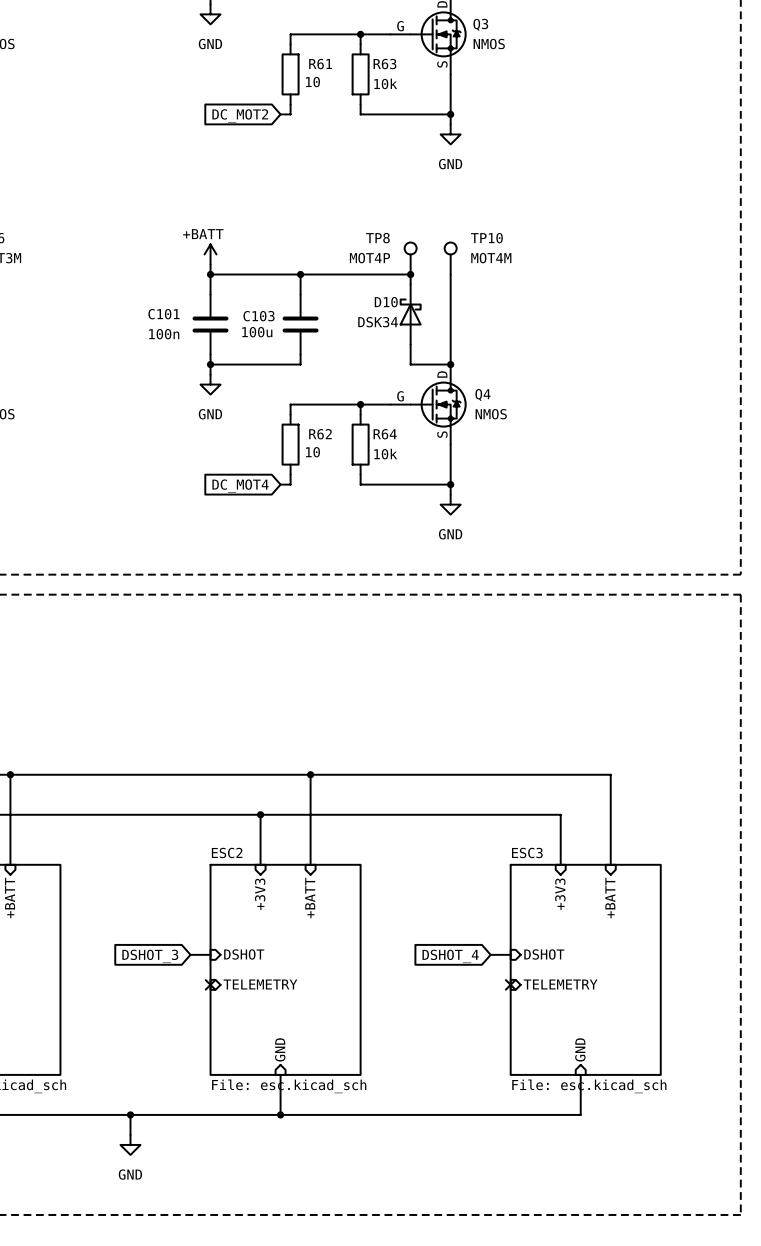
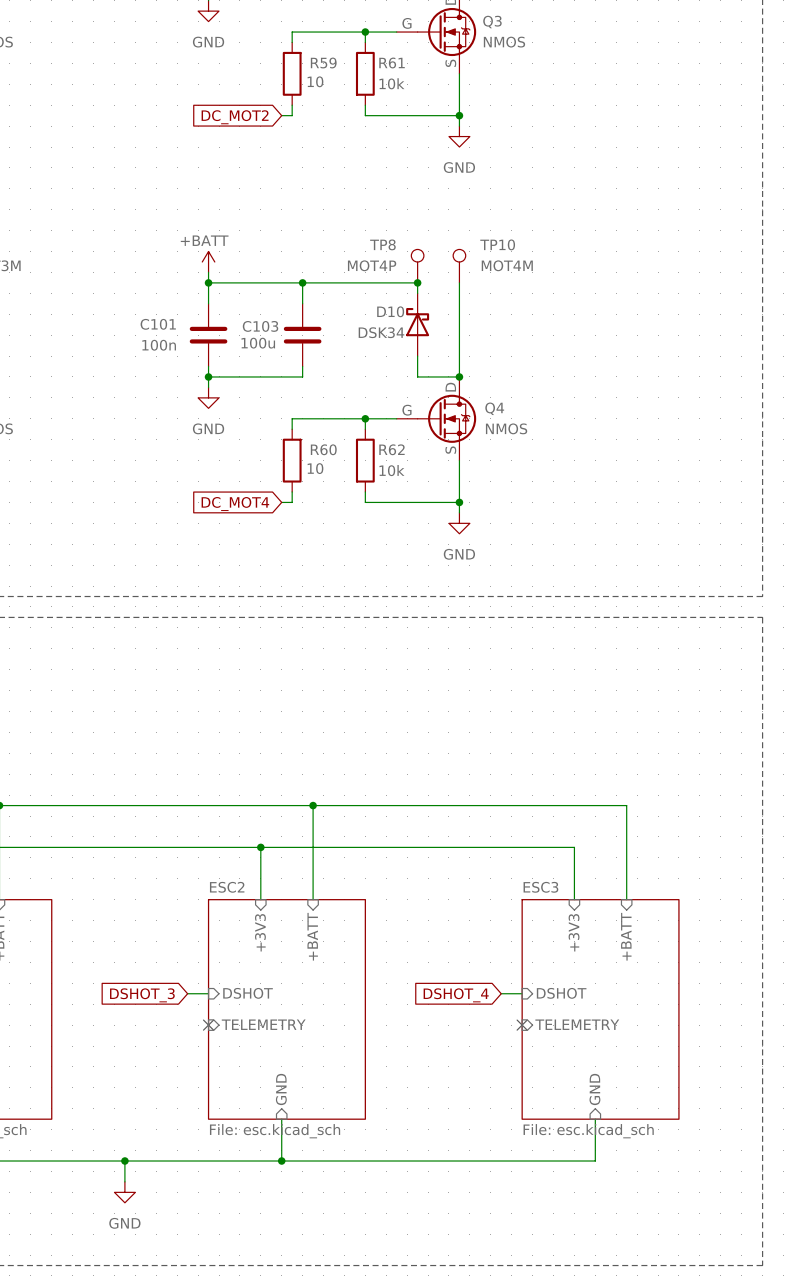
R61 name: R61 (320, 64) -> R59 (323, 63)
R63 name: R63 (384, 64) -> R61 (392, 63)
R62 name: R62 (320, 434) -> R60 (323, 449)
R64 name: R64 (385, 434) -> R62 (391, 449)

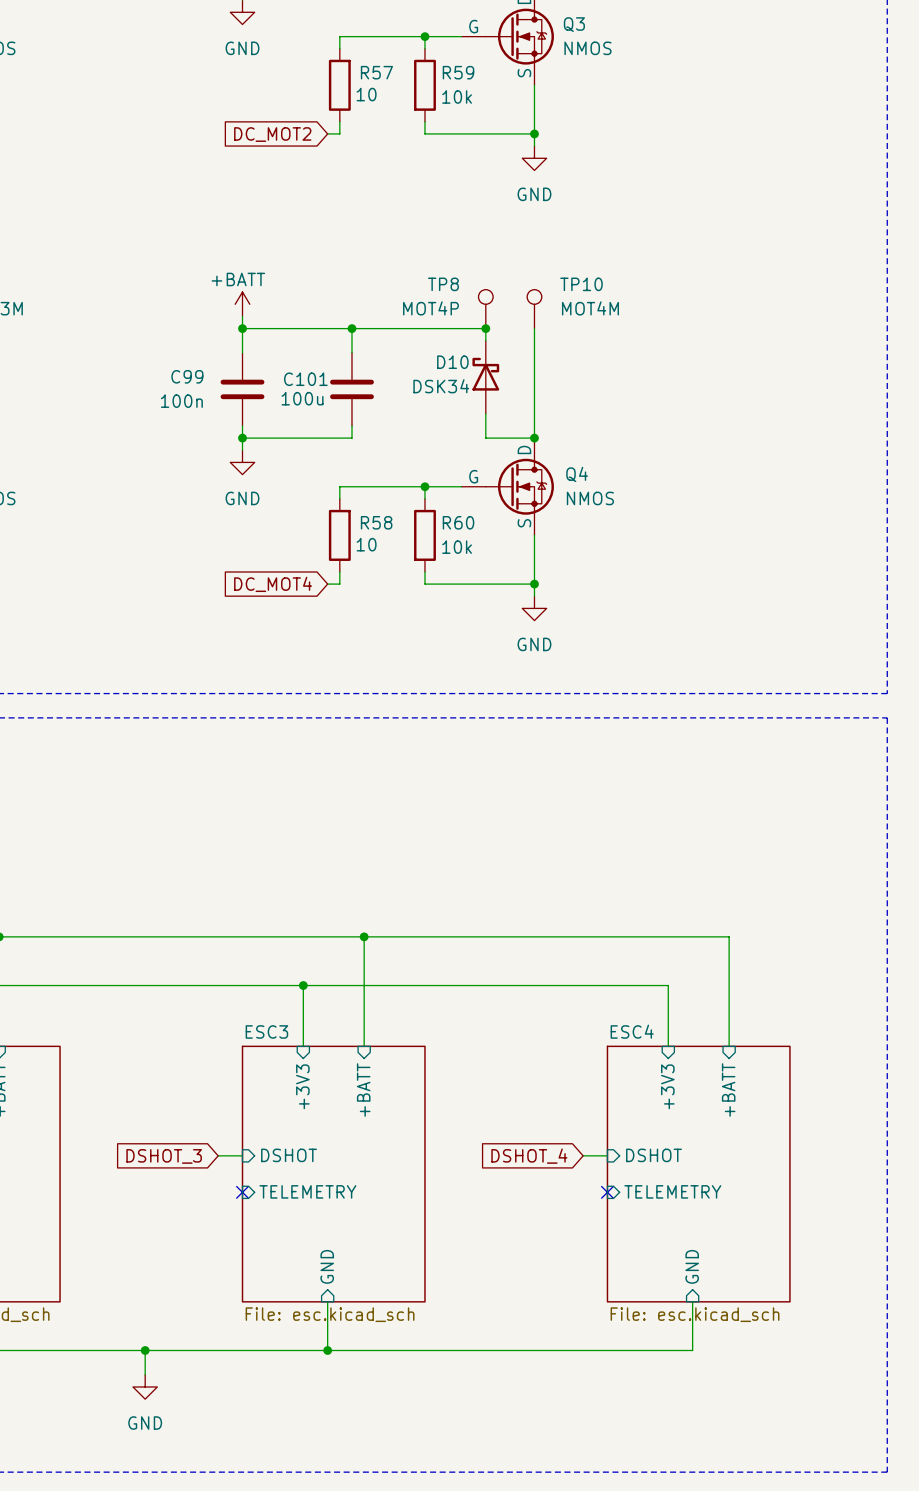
R59 name: R59 (323, 63) -> R57 (376, 72)
R61 name: R61 (392, 63) -> R59 (458, 72)
C101 name: C101 (158, 324) -> C99 (187, 376)
C103 name: C103 (260, 326) -> C101 (305, 379)
R60 name: R60 (323, 449) -> R58 (376, 522)
R62 name: R62 (391, 449) -> R60 (458, 522)
sheet ESC2 name: ESC2 (227, 887) -> ESC3 (266, 1031)
sheet ESC3 name: ESC3 (540, 887) -> ESC4 (632, 1031)

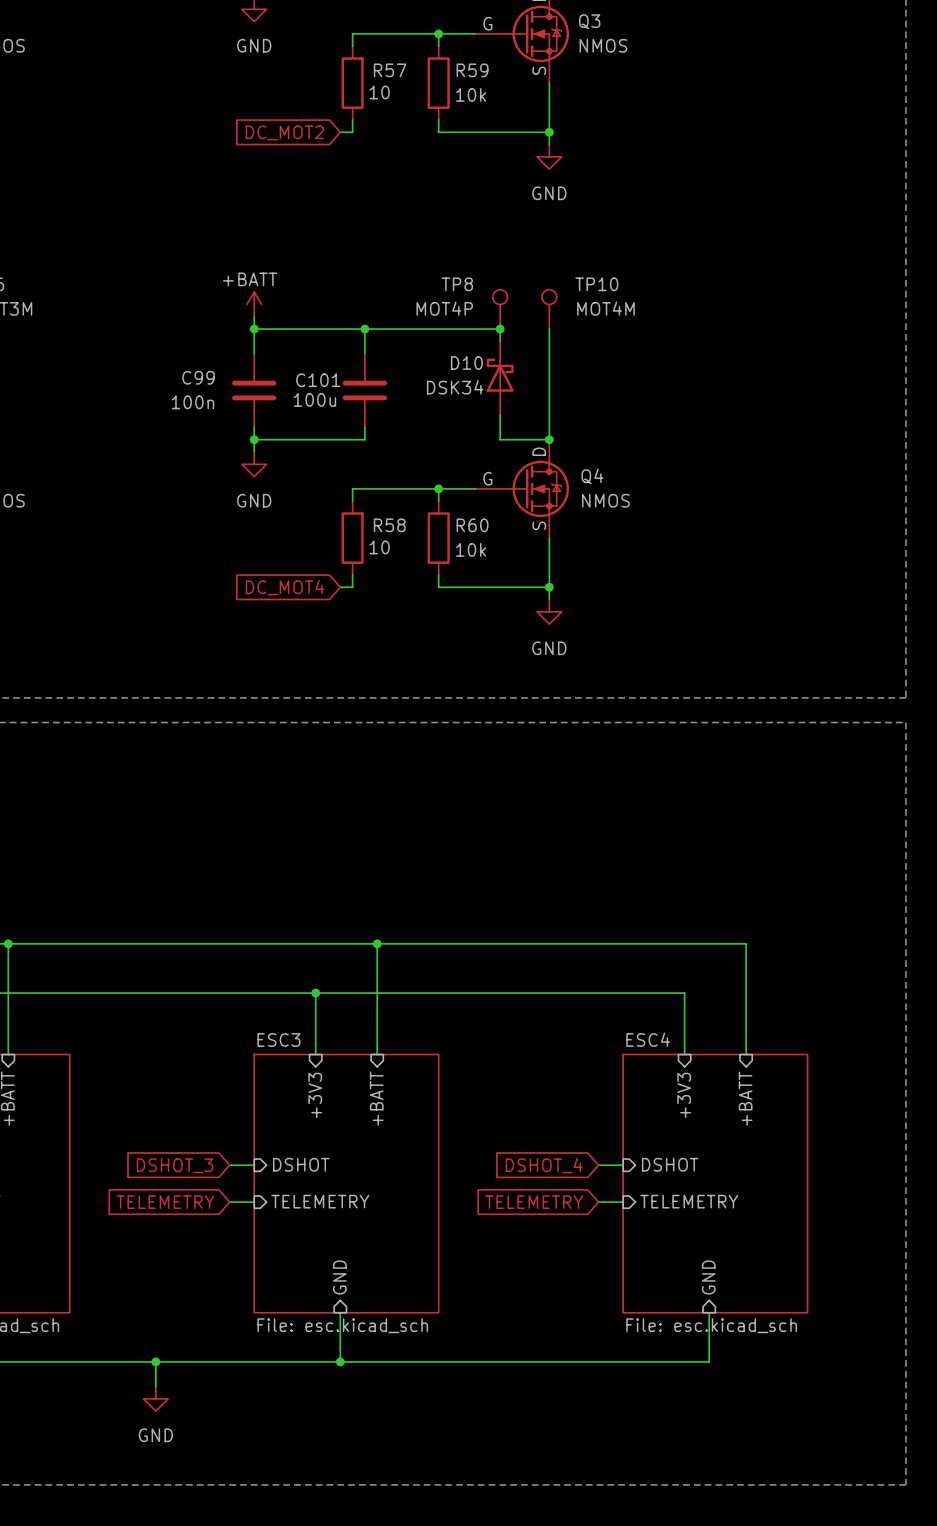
global label: none -> TELEMETRY (165, 1202)
wire: none -> (229, 1202) (254, 1202)
no-connect mark: (242, 1192) -> none
global label: none -> TELEMETRY (534, 1202)
wire: none -> (598, 1202) (623, 1202)
no-connect mark: (607, 1192) -> none

